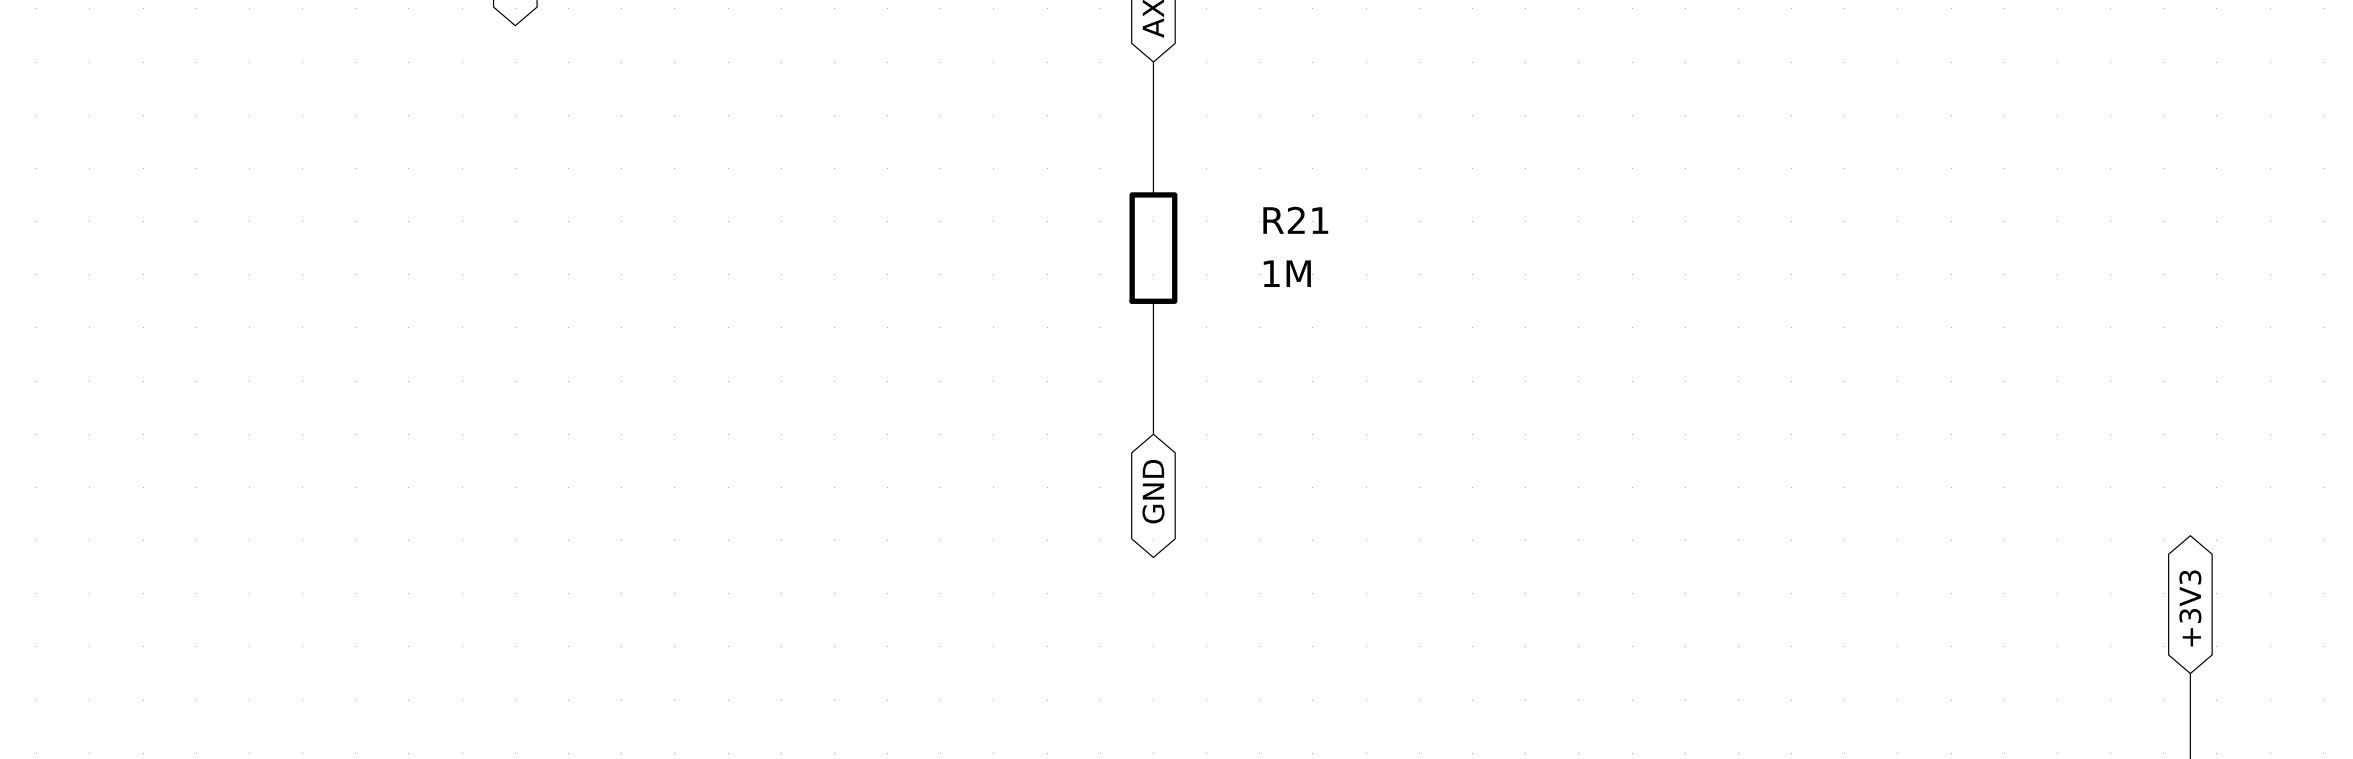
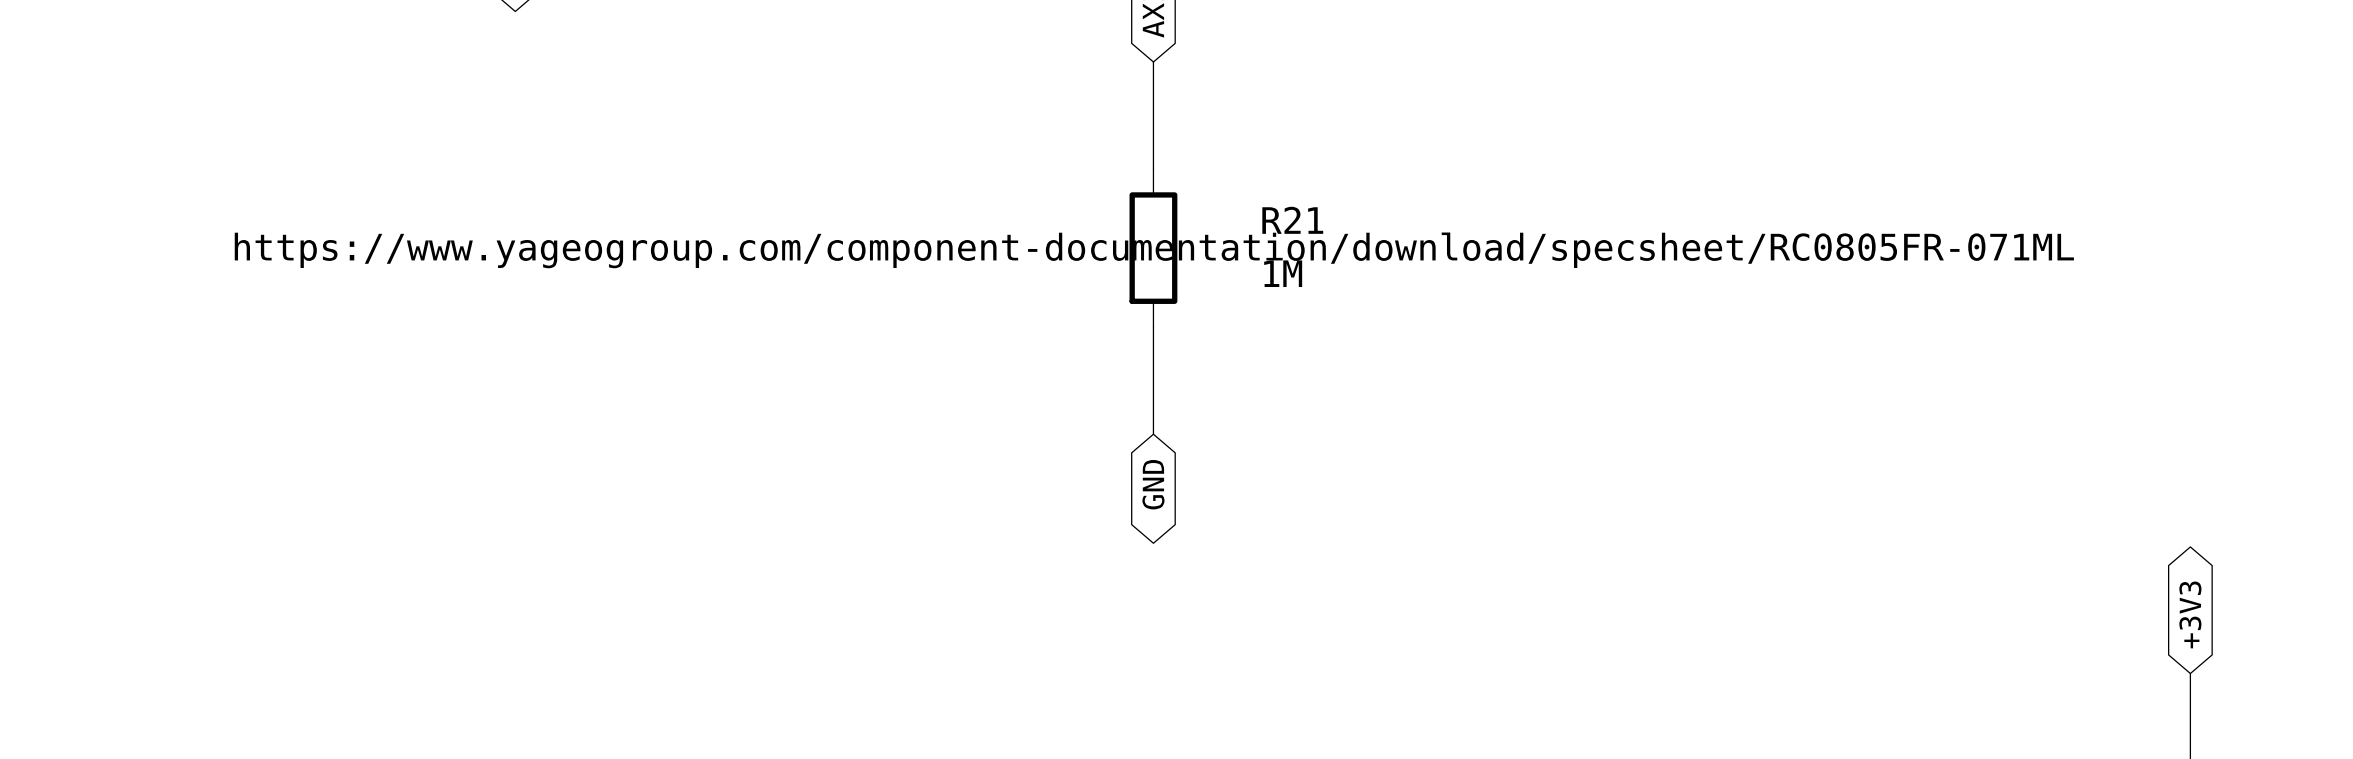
R21 text: none -> https://www.yageogroup.com/component-documentation/download/specsheet/RC0805FR-071ML (1154, 250)

